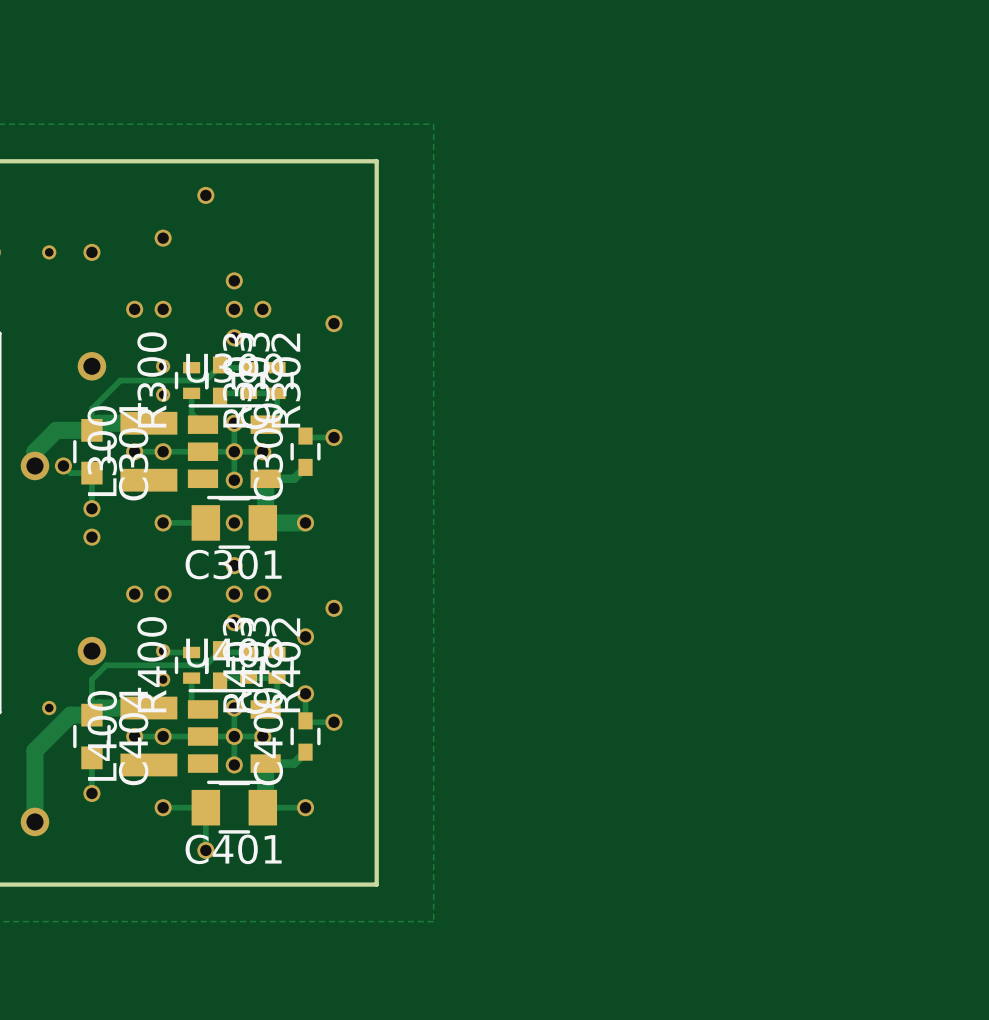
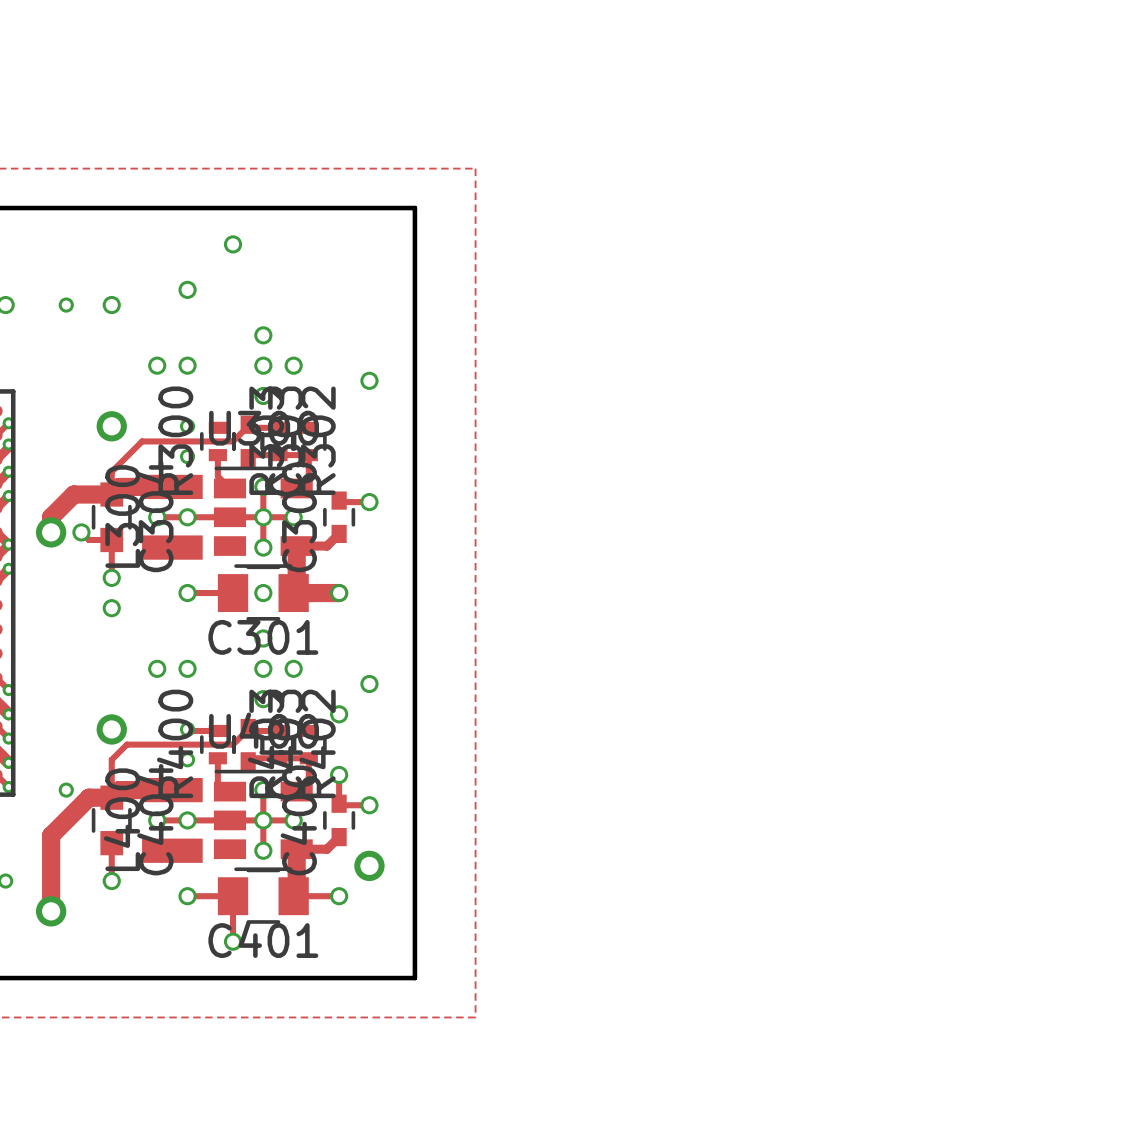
via: none -> (369, 865)

